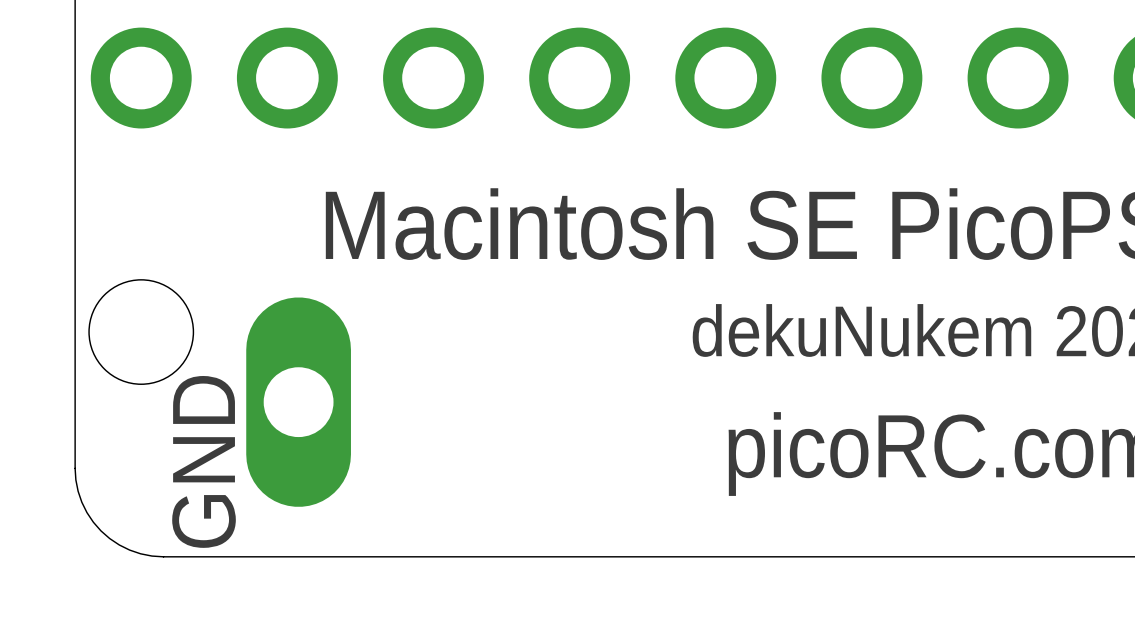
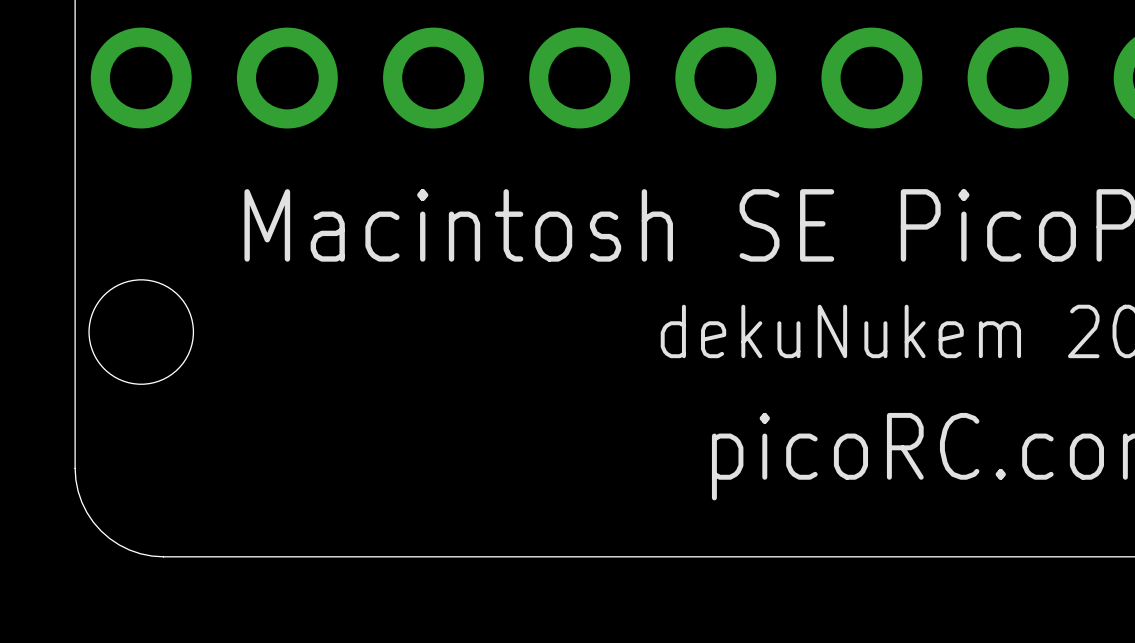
part: (298, 402) -> none
text: GND (204, 461) -> none

